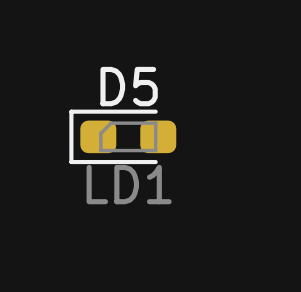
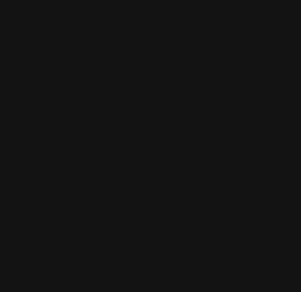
D5: LD1 (122, 136) -> none

